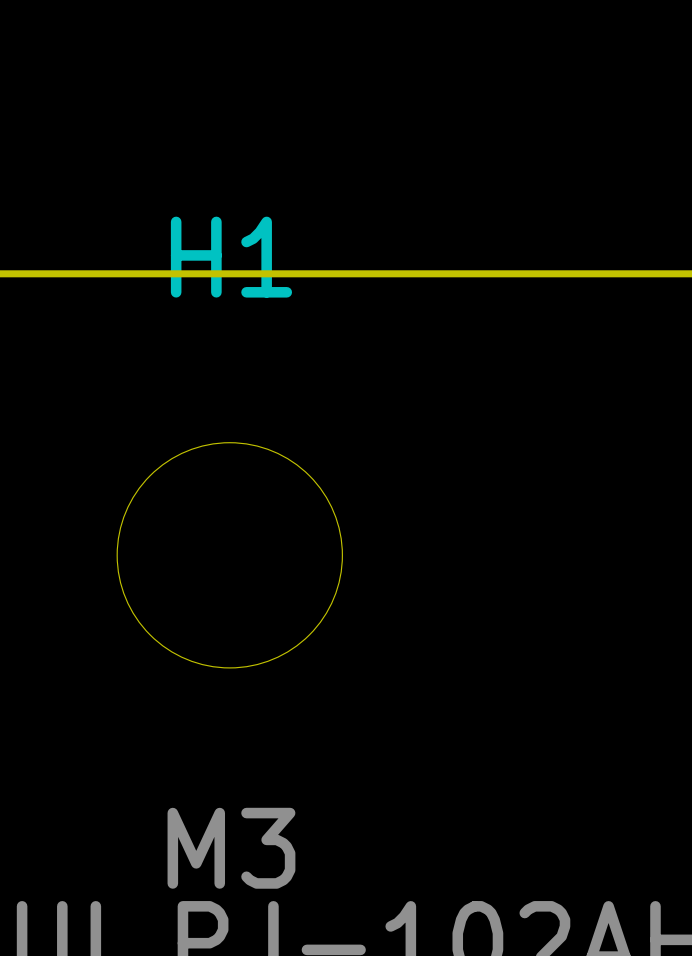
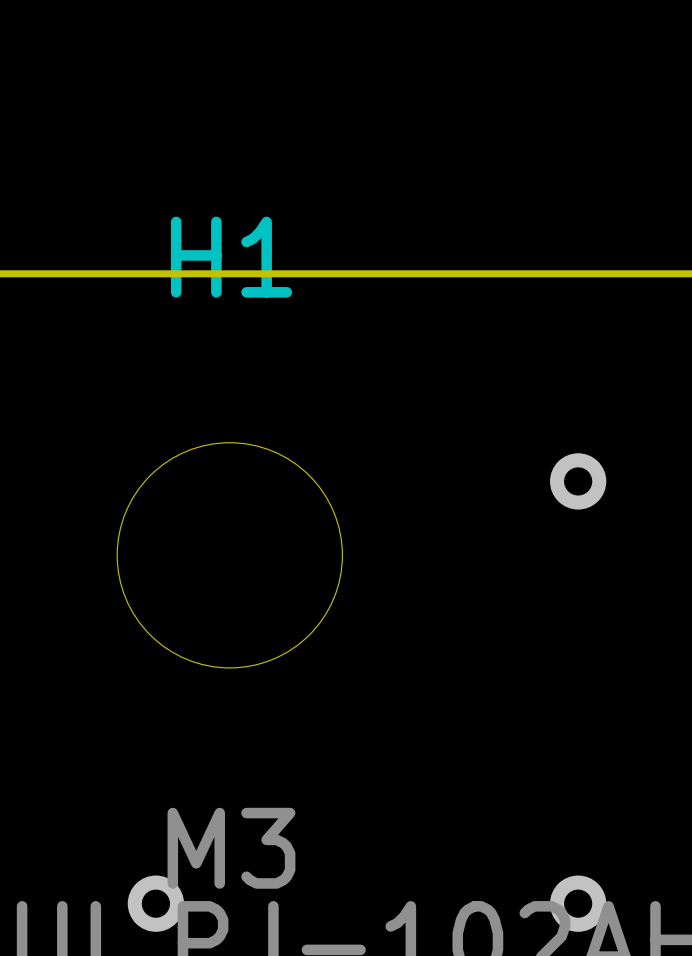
via: none -> (578, 481)
via: none -> (155, 903)
via: none -> (578, 903)

